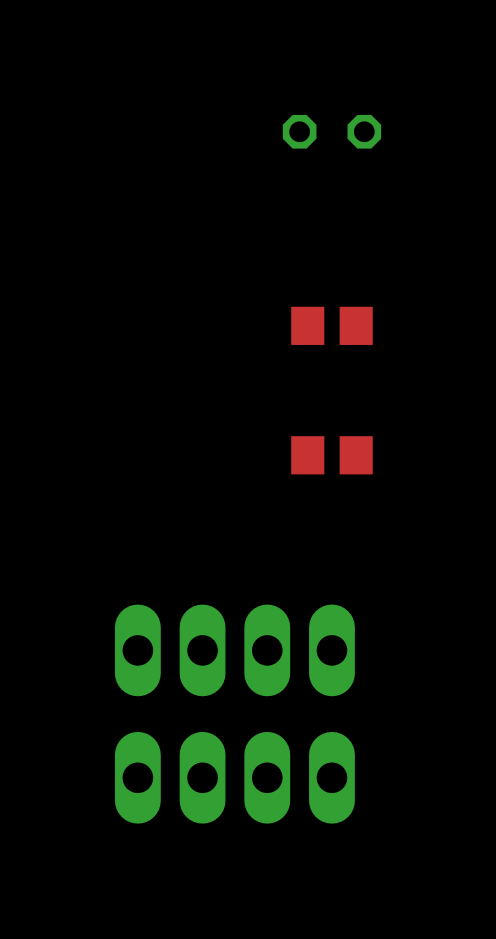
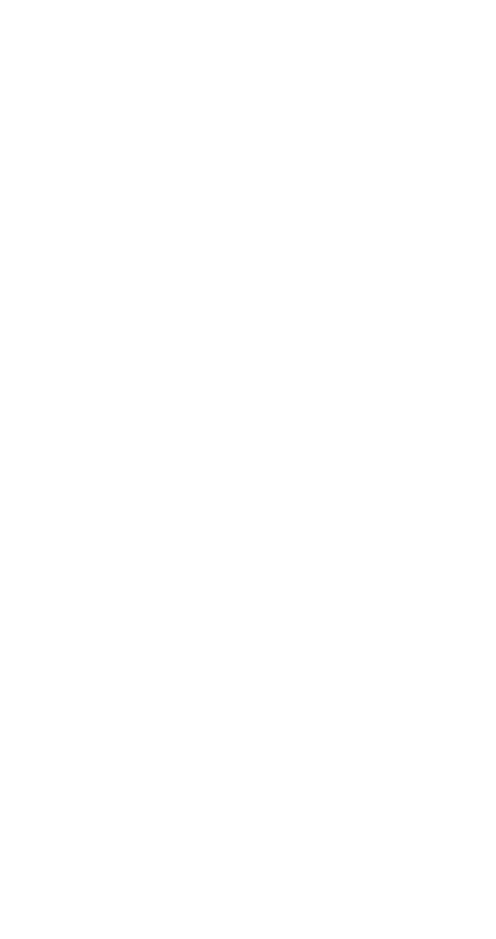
part: (331, 131) -> none
part: (331, 325) -> none
part: (331, 455) -> none
part: (234, 714) -> none

